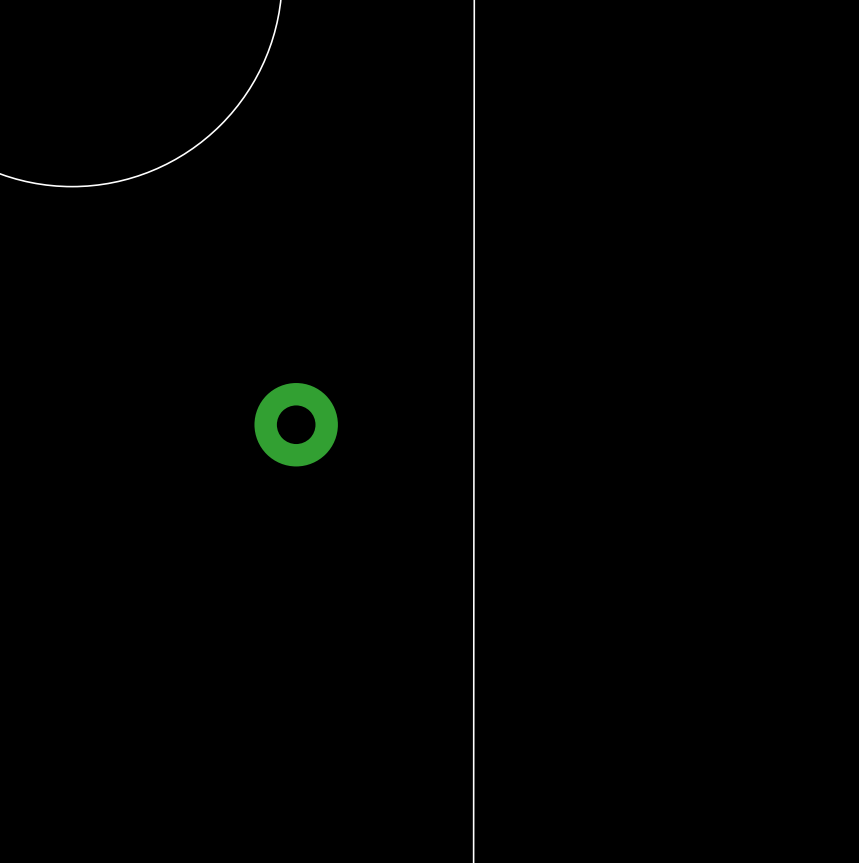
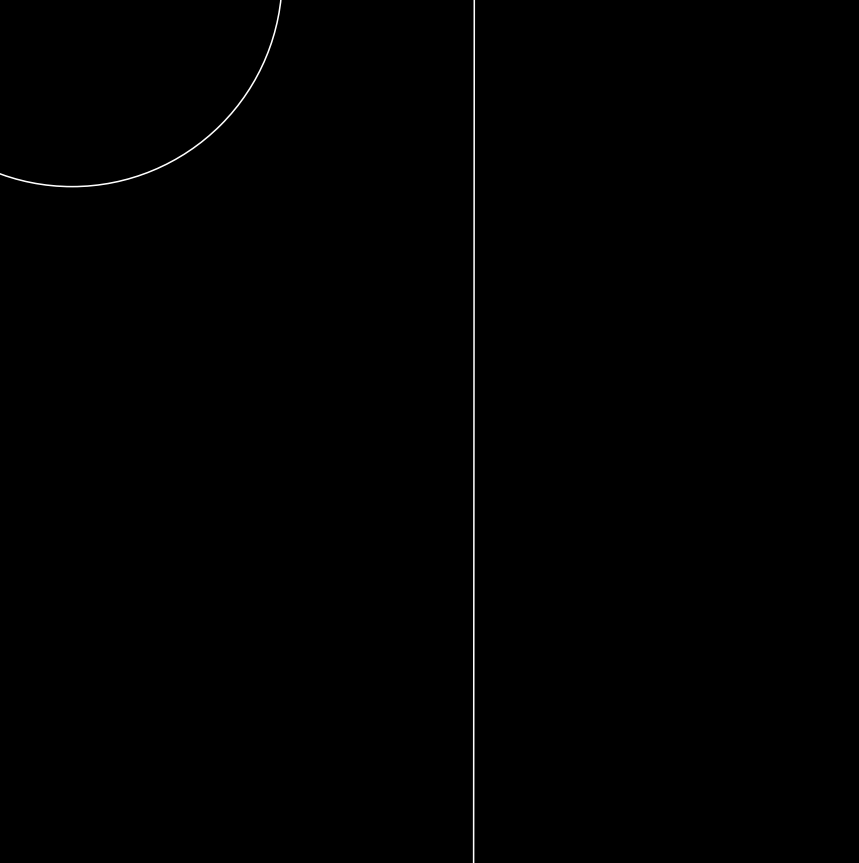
via: (296, 424) -> none

